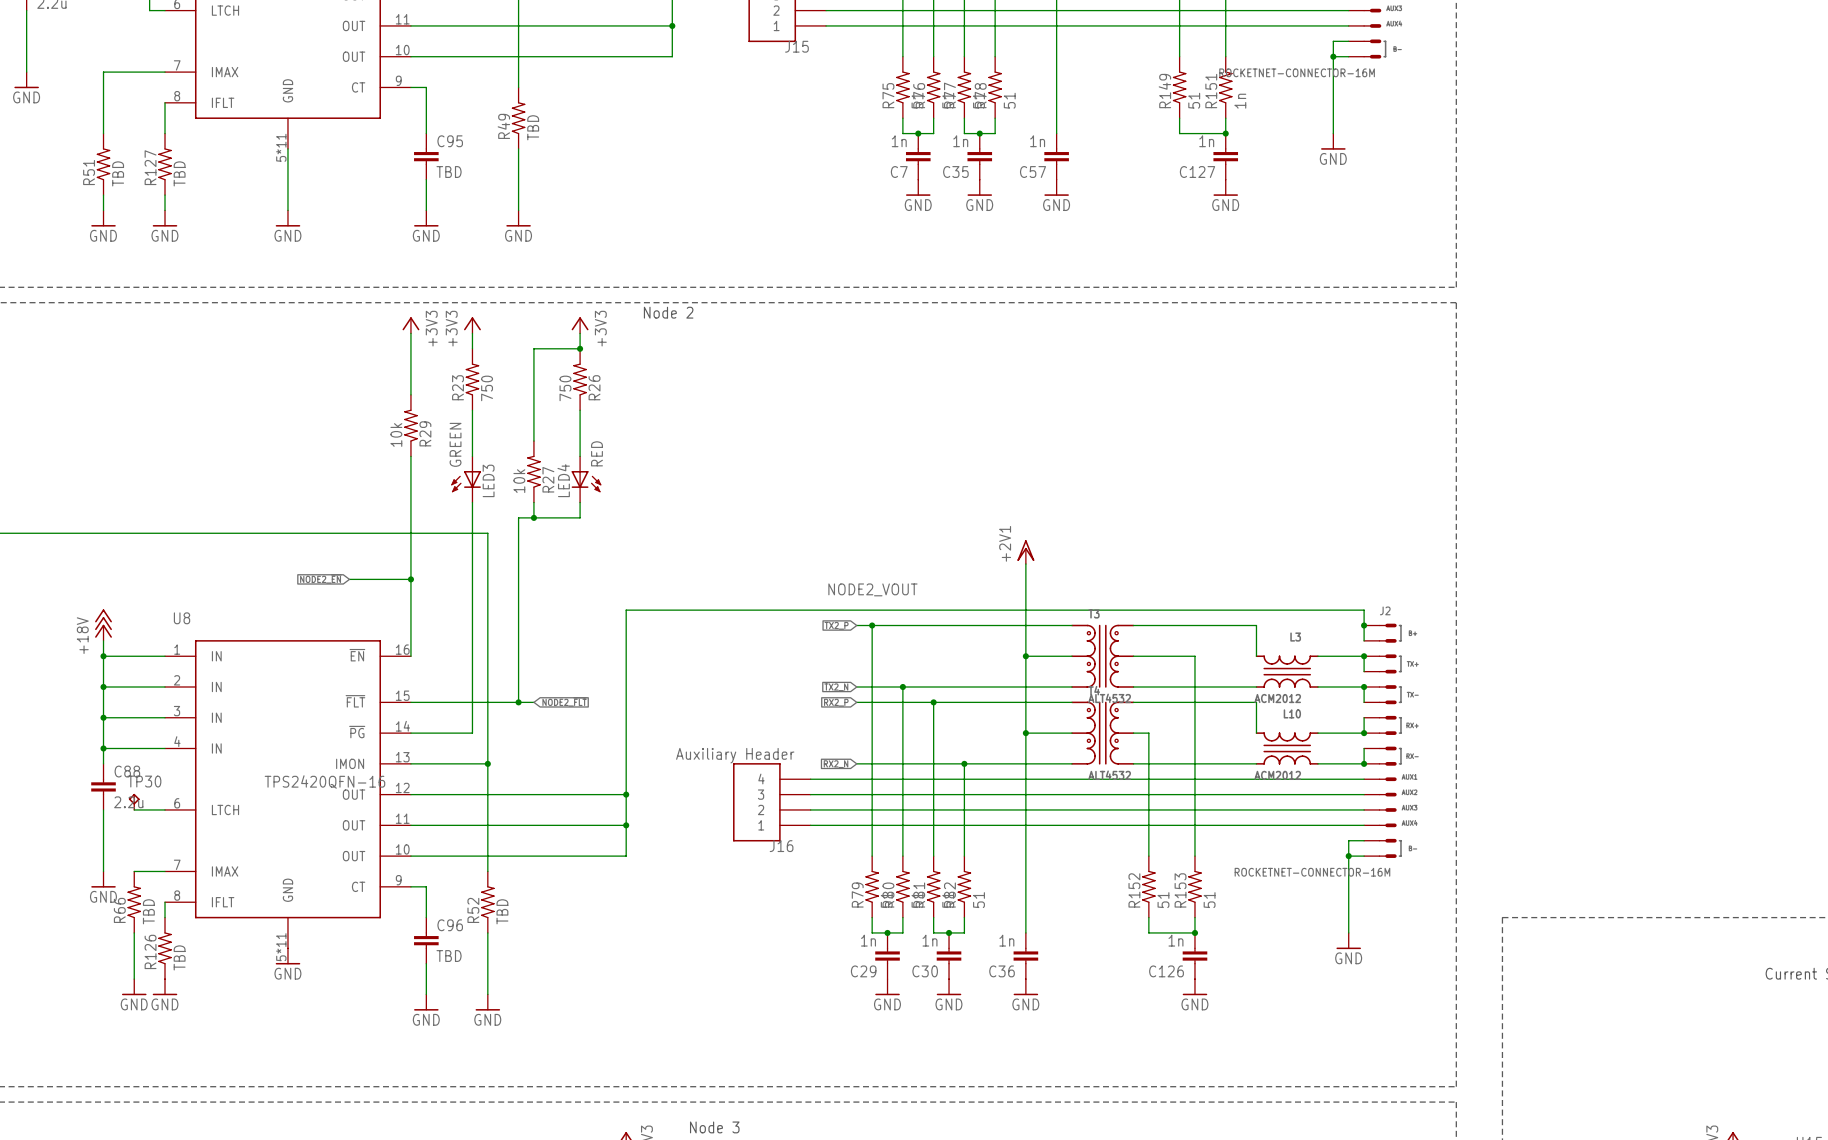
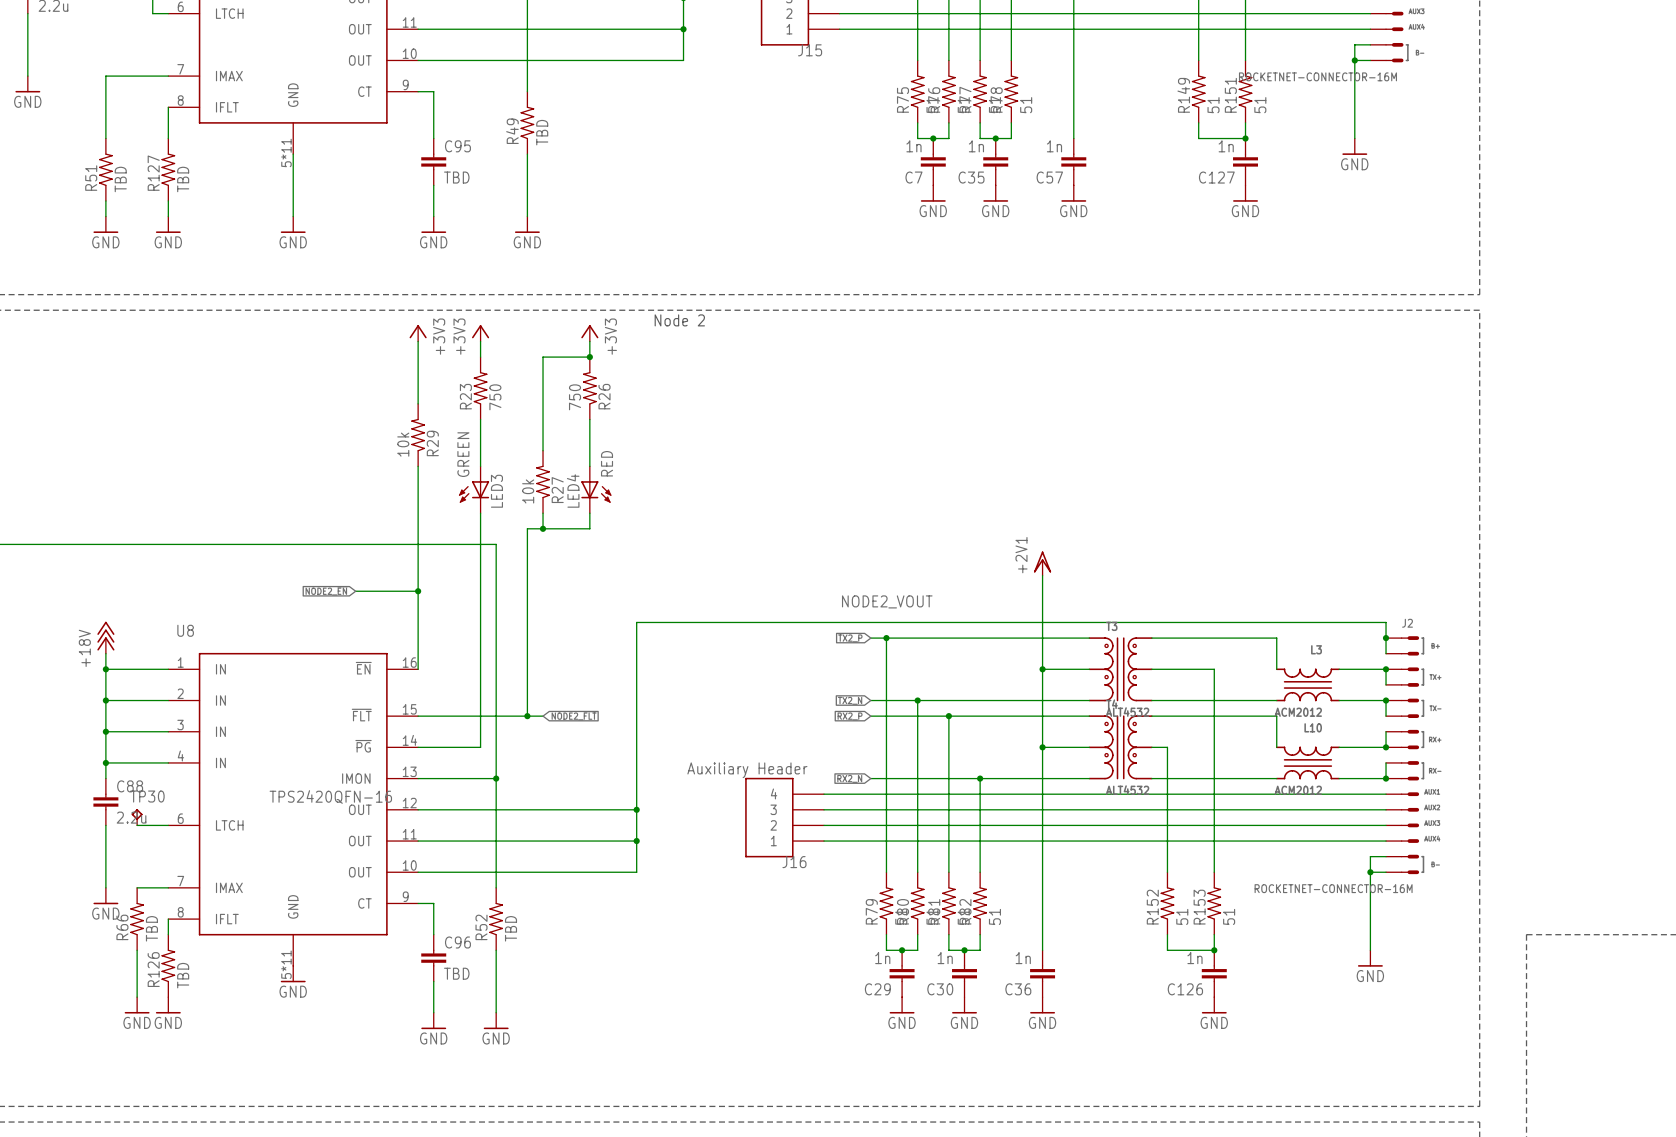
R151 value: 1n (1240, 101) -> 51 (1260, 105)

